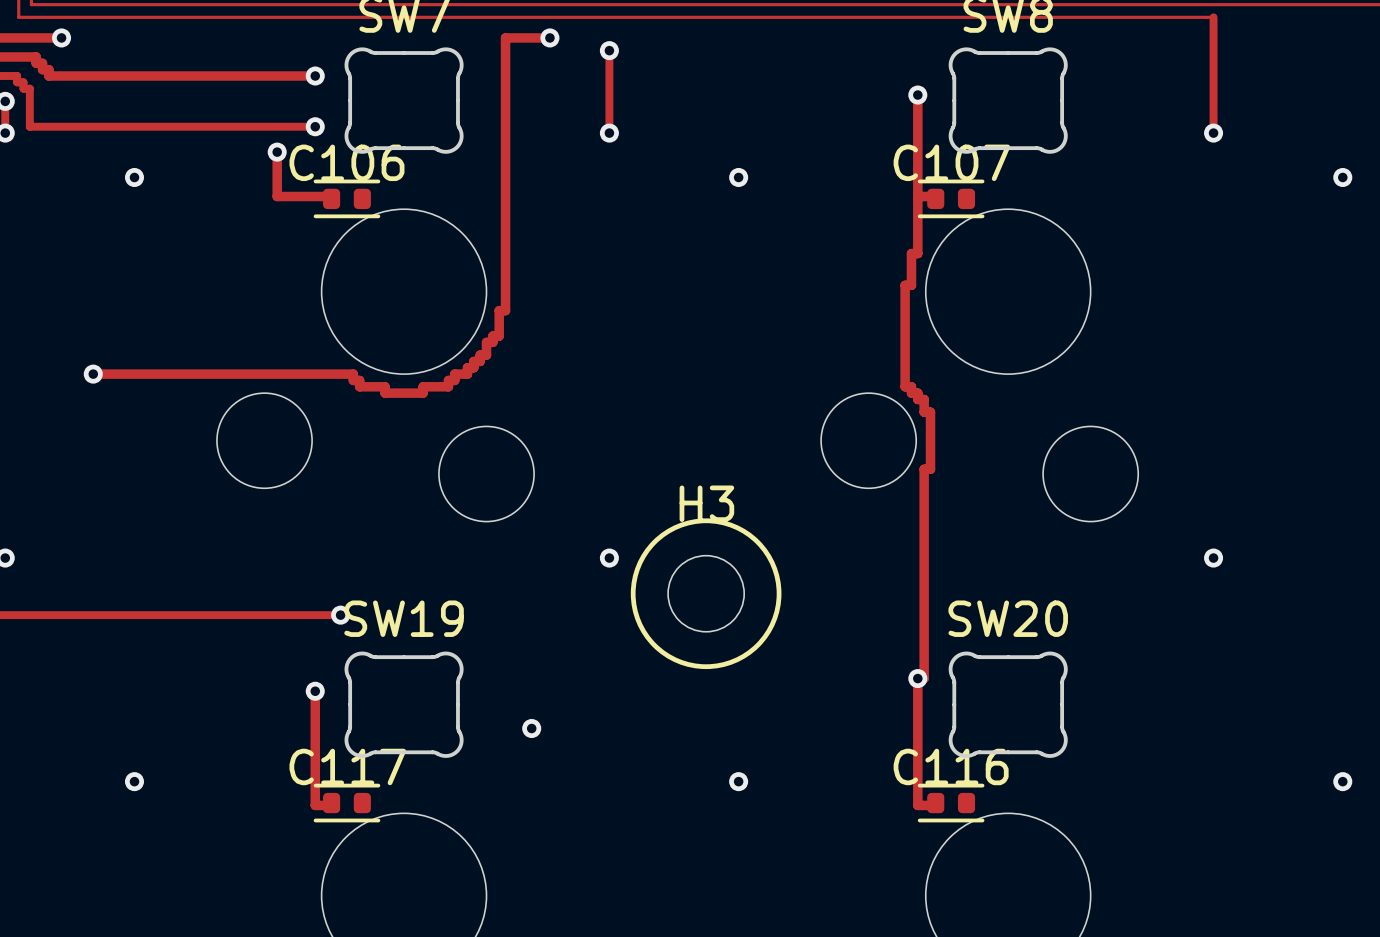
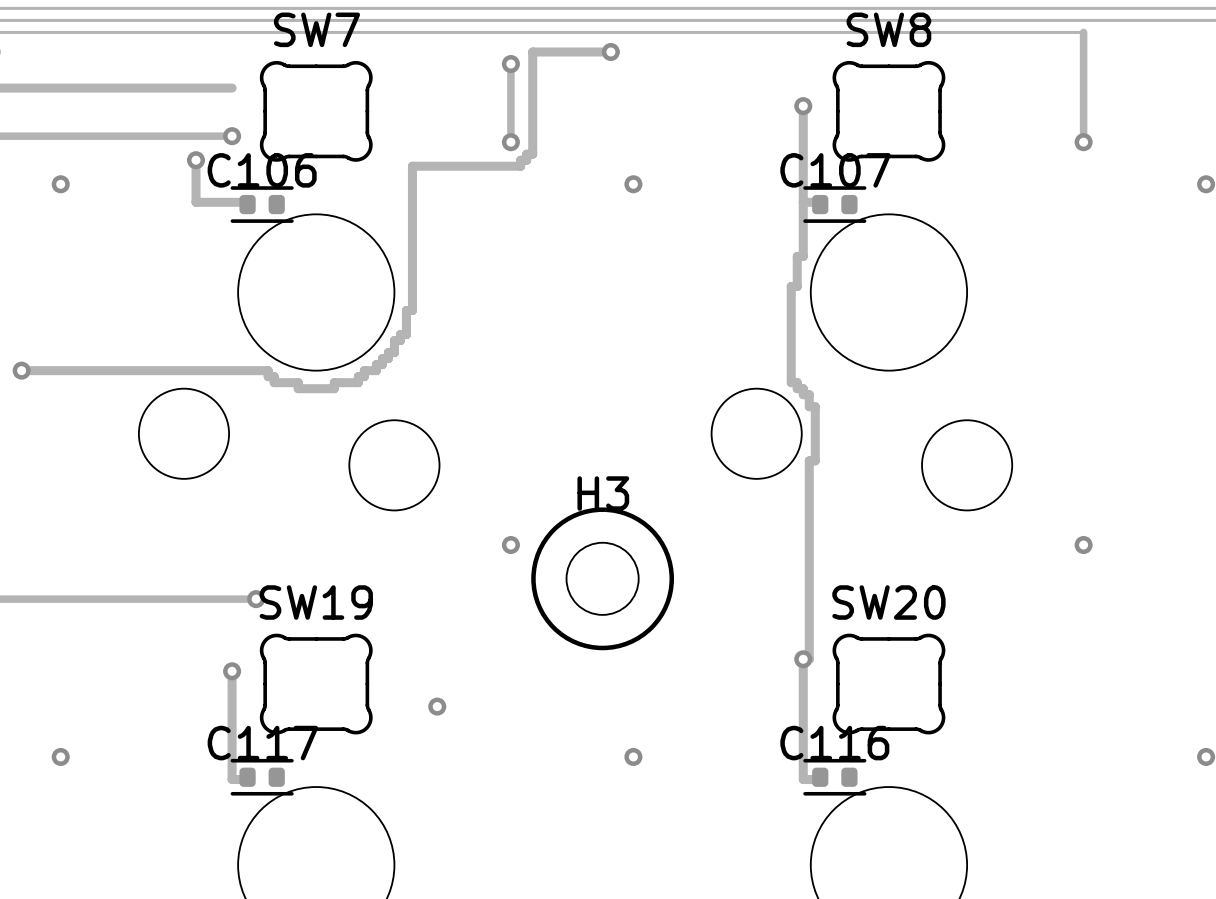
track: (549, 37) (505, 37) (505, 158) -> (610, 51) (532, 51) (532, 154) (526, 154) (526, 160) (520, 160) (520, 166) (412, 166)
via position: (549, 37) -> (610, 51)
via: (315, 76) -> none

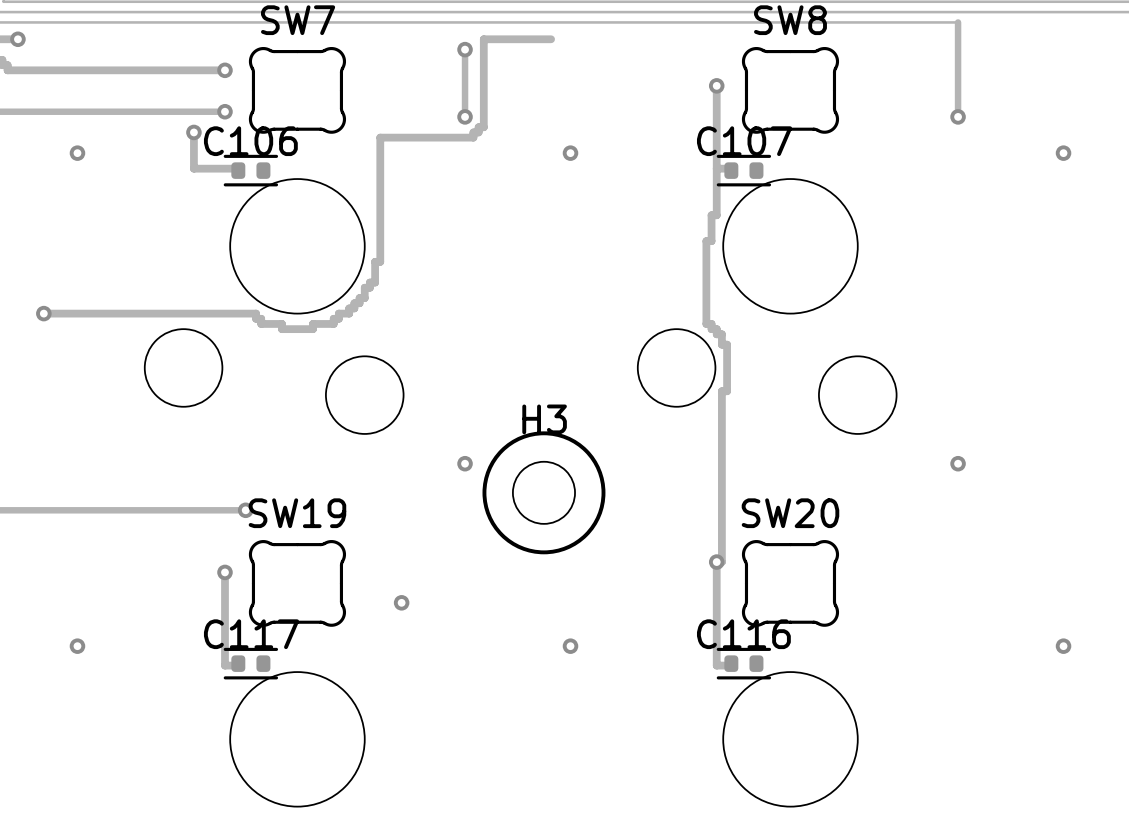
via: (610, 51) -> none
via: none -> (224, 70)

